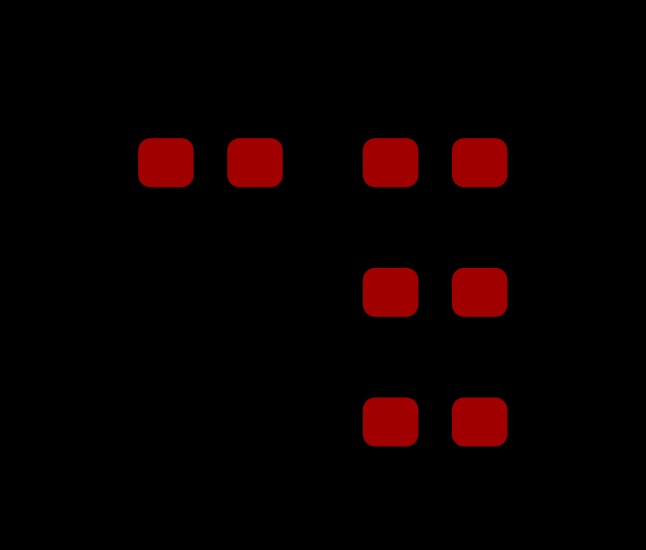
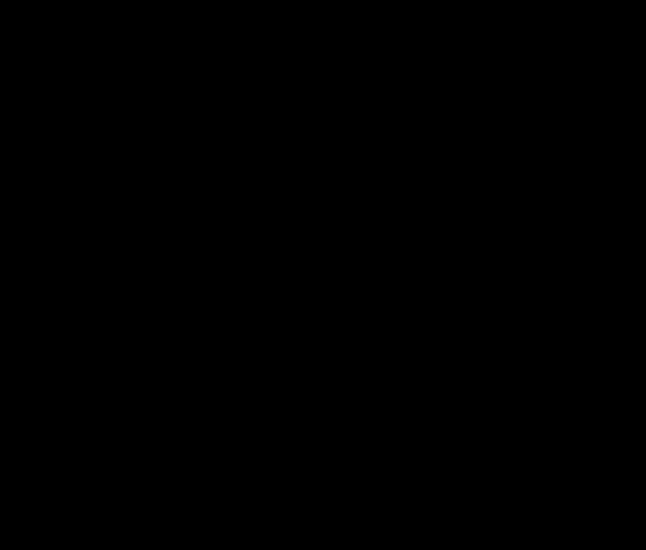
part: (210, 162) -> none
part: (435, 162) -> none
part: (435, 292) -> none
part: (435, 421) -> none

